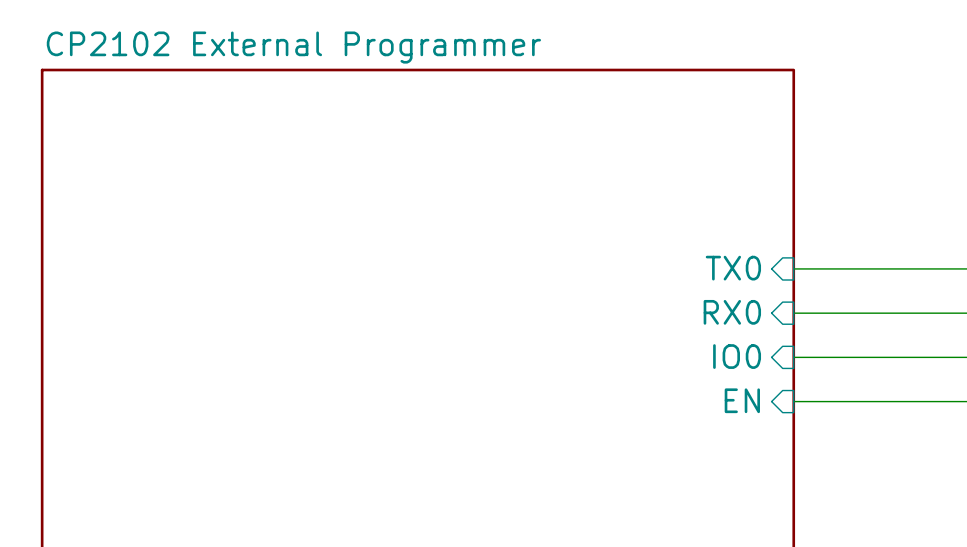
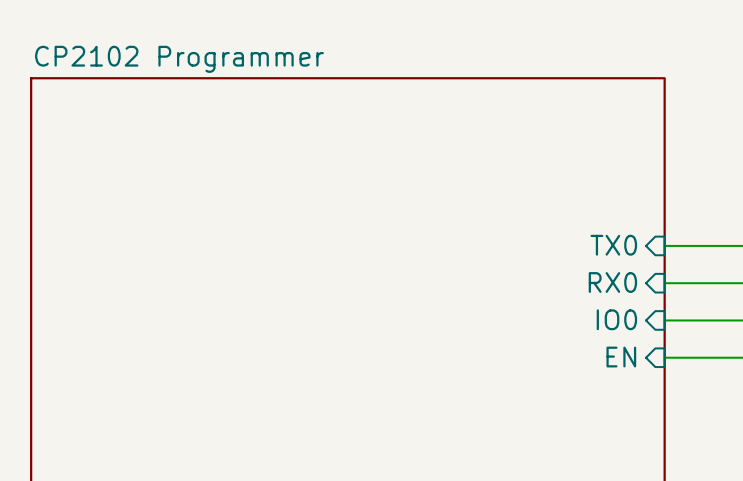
sheet CP2102 External Programmer name: CP2102 External Programmer (293, 47) -> CP2102 Programmer (179, 59)

